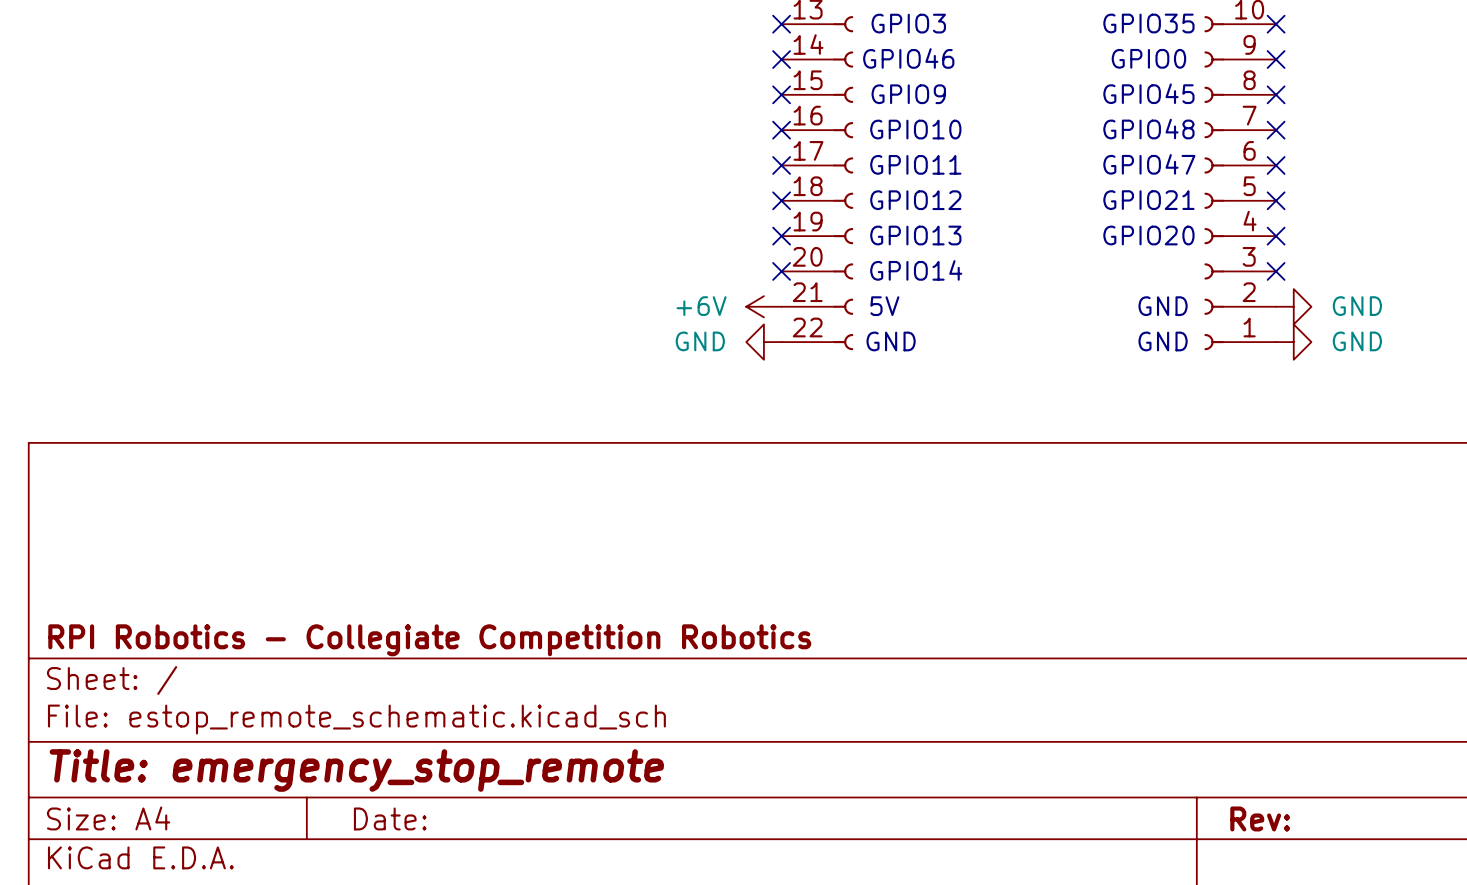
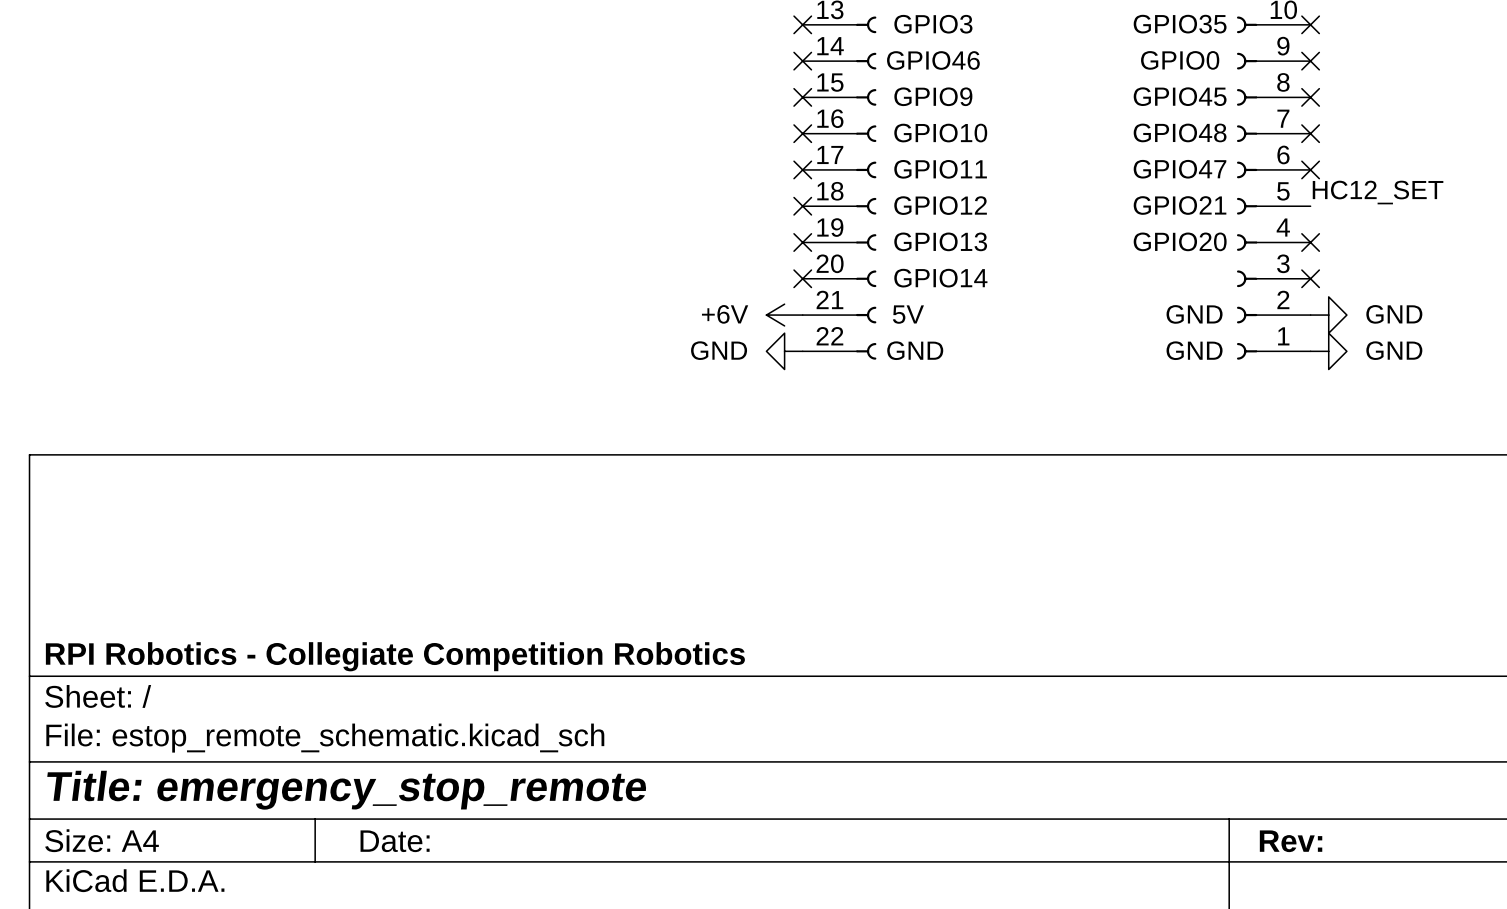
label: none -> HC12_SET (1378, 192)
no-connect mark: (1276, 200) -> none

